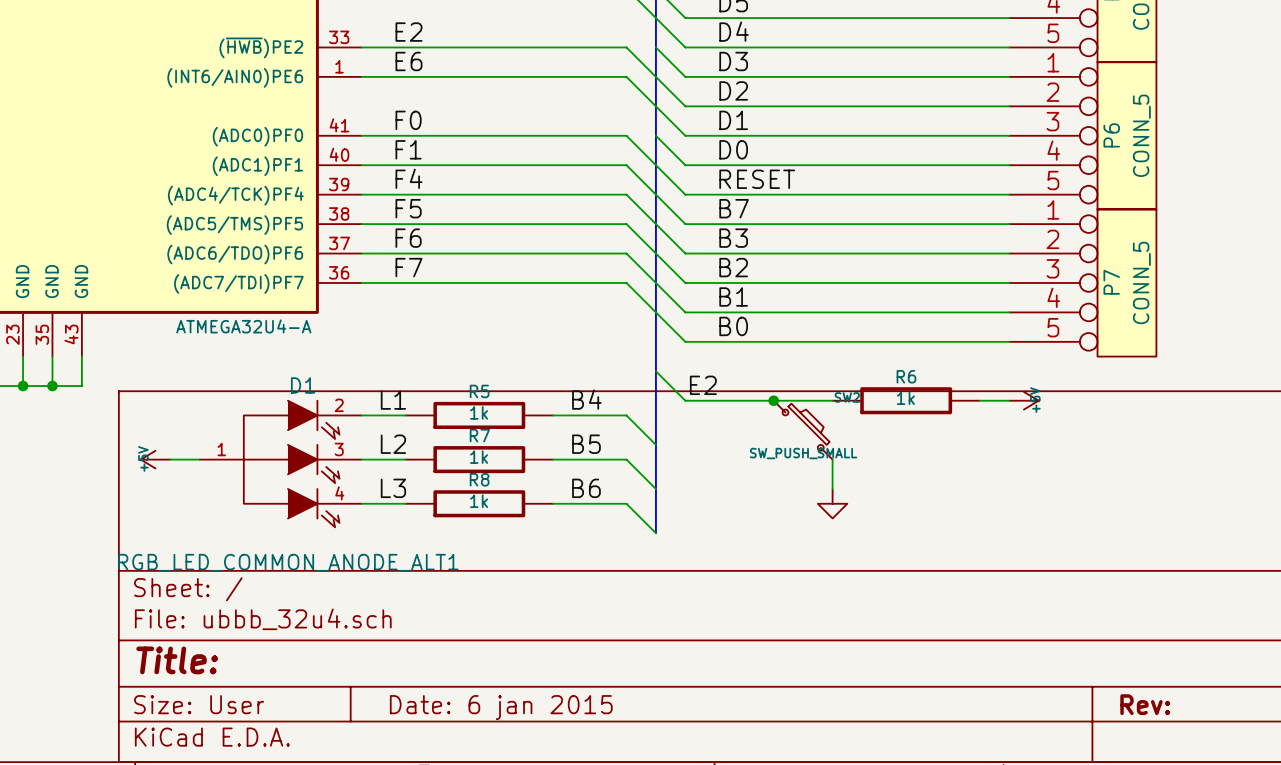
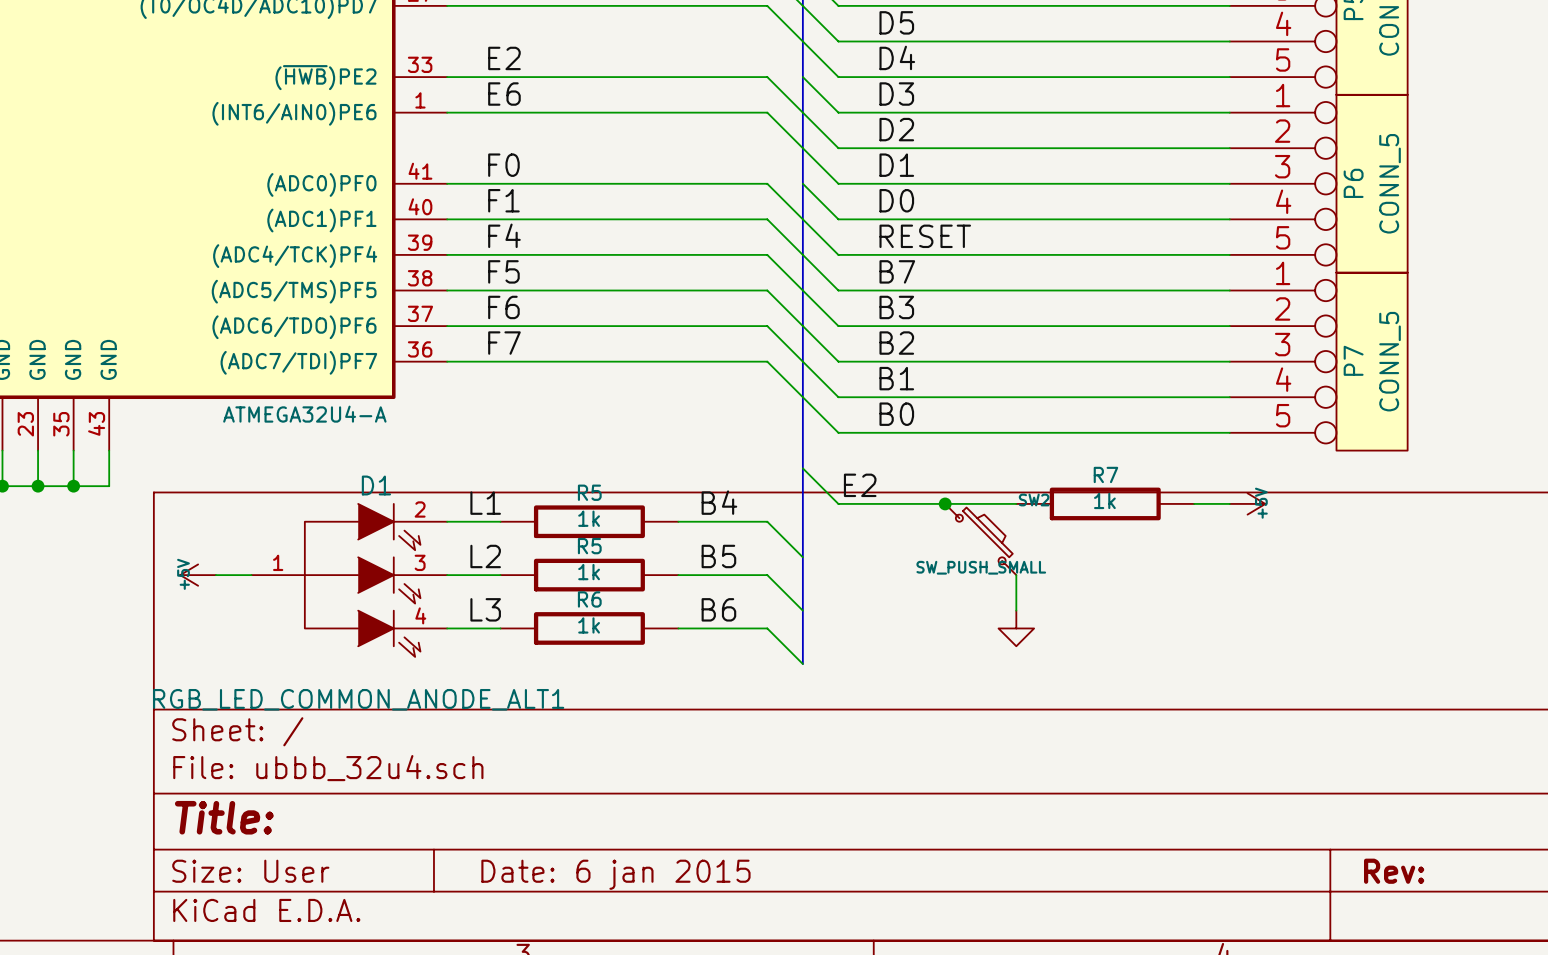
R6 name: R6 (906, 376) -> R7 (1105, 474)
R7 name: R7 (479, 435) -> R5 (589, 546)
R8 name: R8 (479, 479) -> R6 (589, 599)

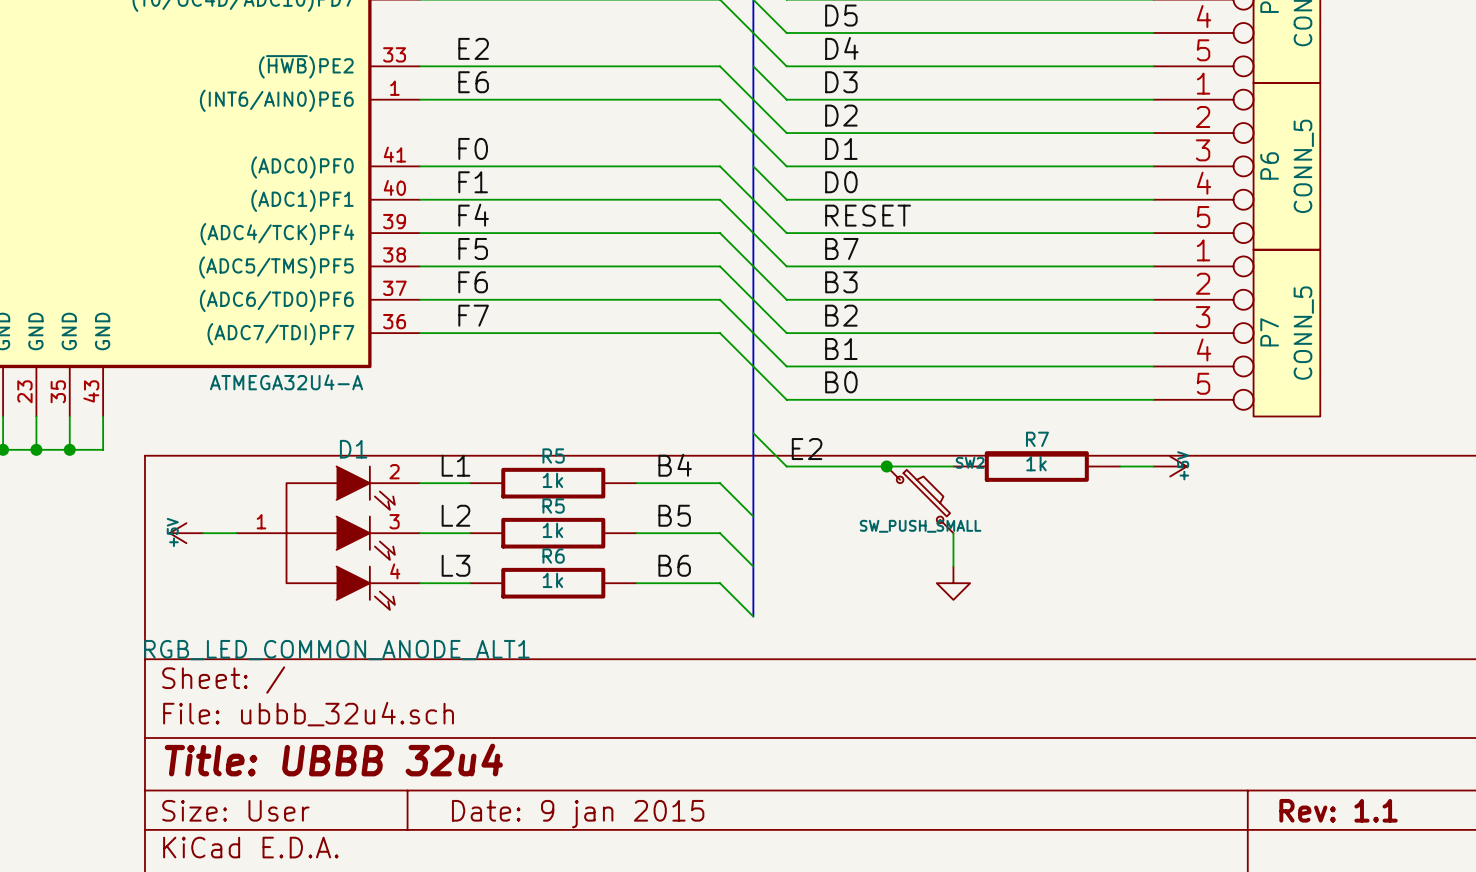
title block: Title: (224, 817) -> Title: UBBB 32u4 (333, 760)
title block: Rev: (1394, 871) -> Rev: 1.1 (1338, 810)
title block: Date: 6 jan 2015 (615, 874) -> Date: 9 jan 2015 (578, 814)

